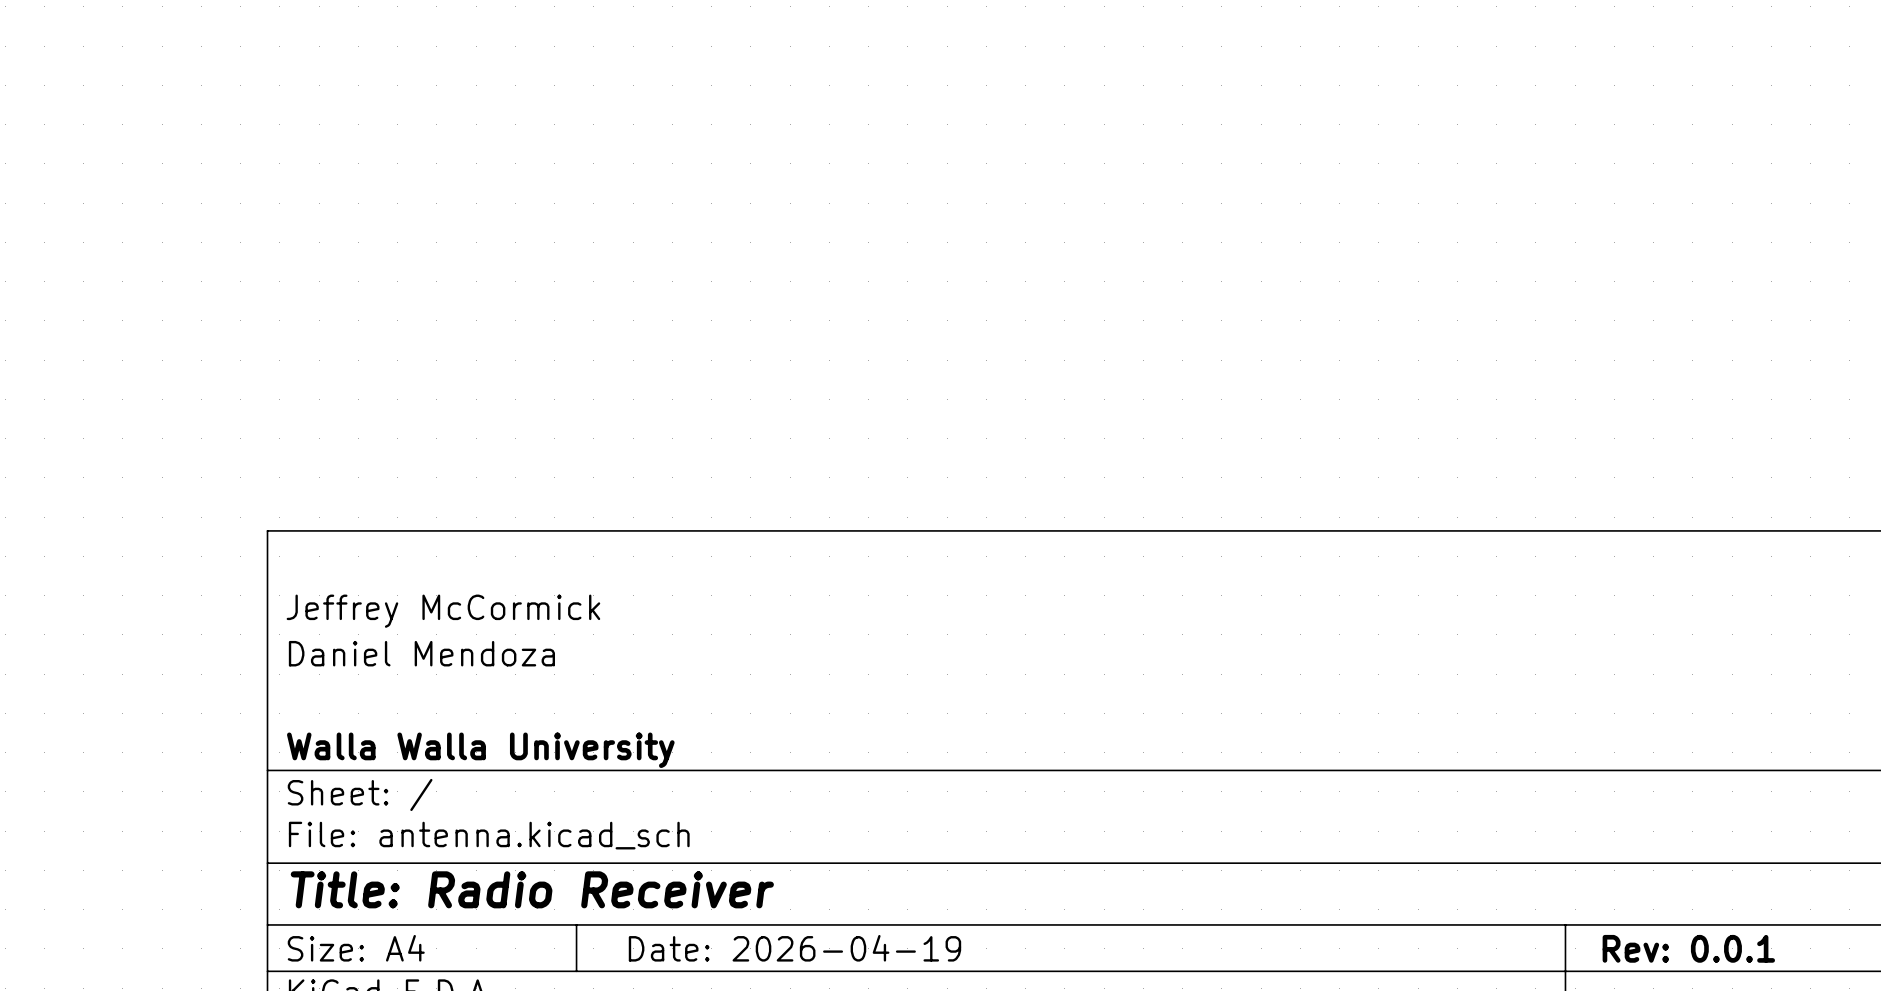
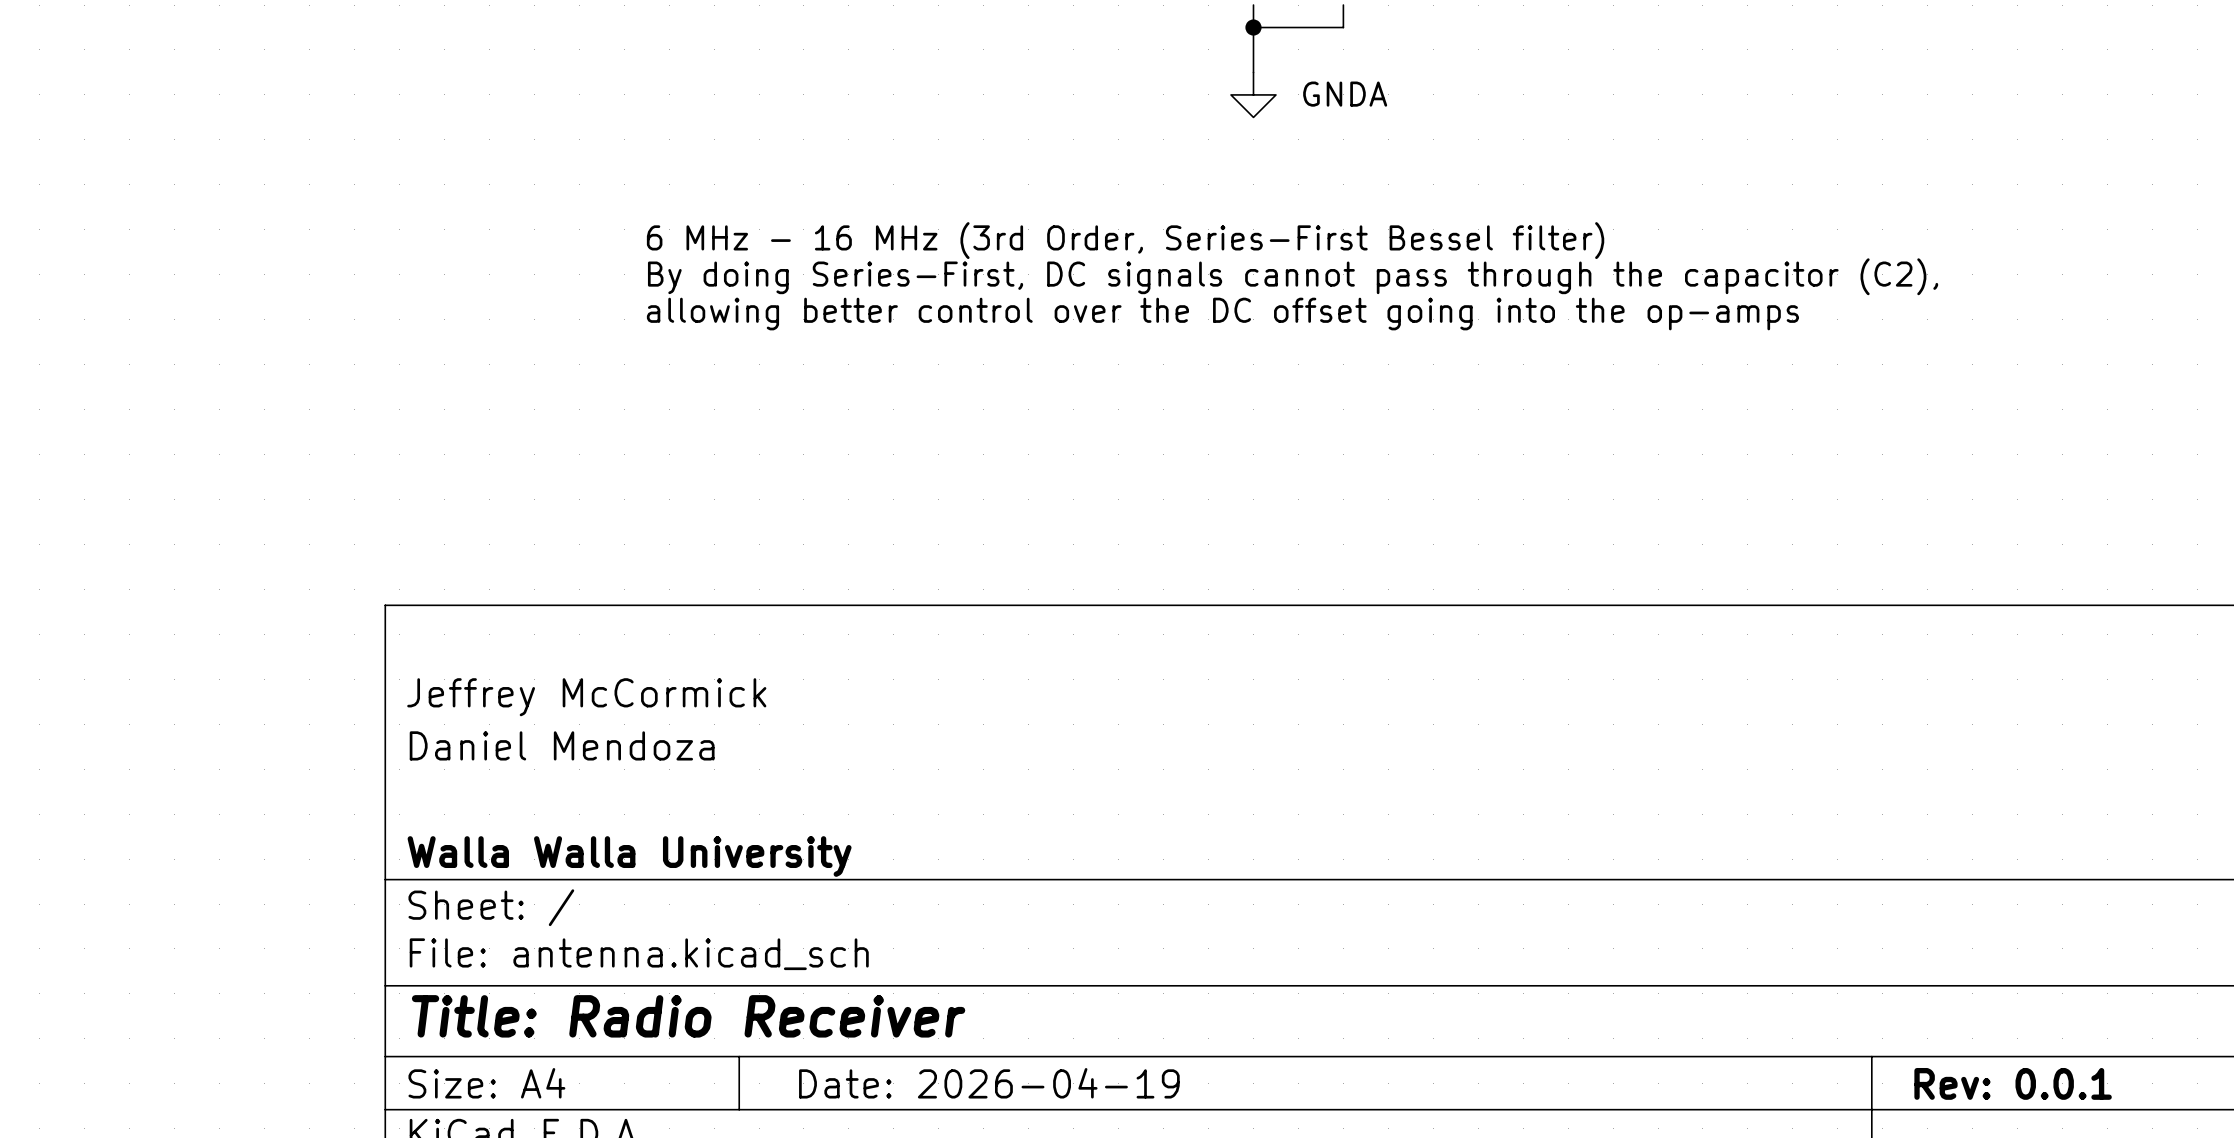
wire: none -> (1253, 5) (1253, 72)
wire: none -> (1343, 5) (1343, 27) (1253, 27)
junction: none -> (1253, 27)
power symbol: none -> GNDA (1253, 94)
text: none -> 6 MHz - 16 MHz (3rd Order, Series-First Bessel filter) (1125, 240)
text: none -> By doing Series-First, DC signals cannot pass through the capacitor (C2), (1293, 276)
text: none -> allowing better control over the DC offset going into the op-amps (1222, 314)

